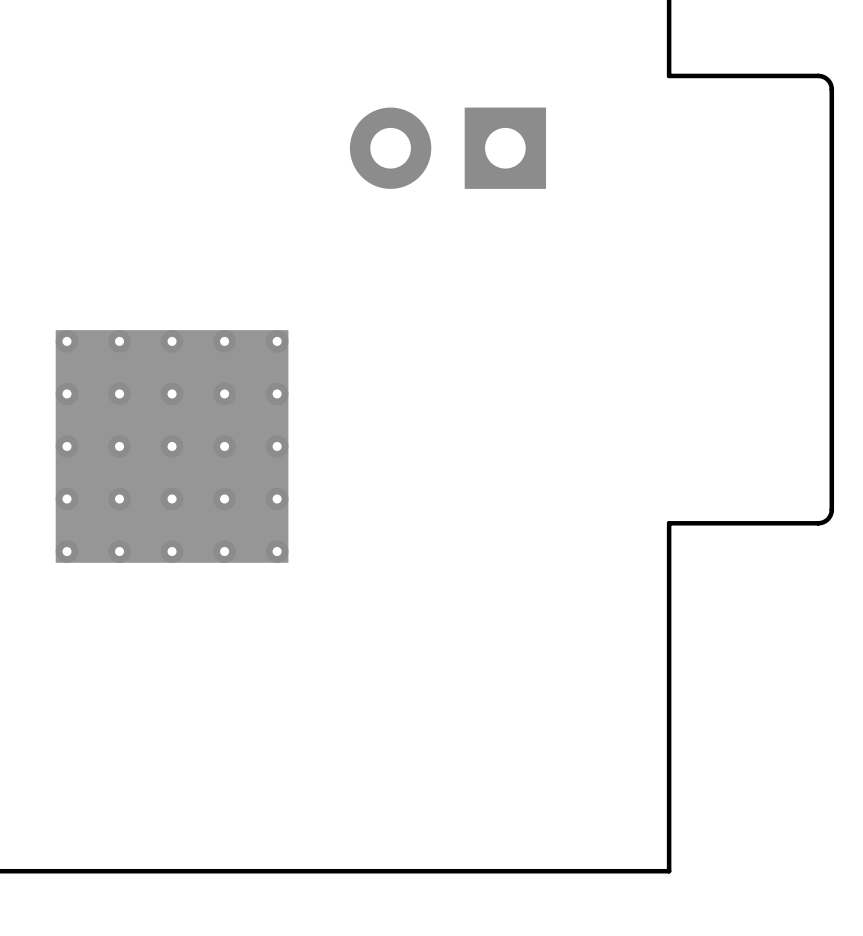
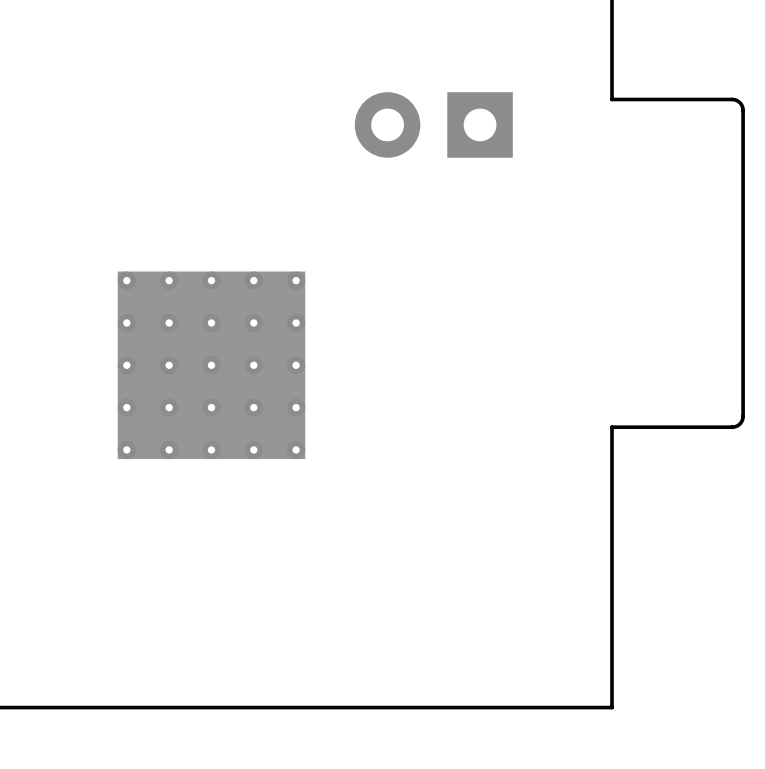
board edge: (669, 75) (821, 76) (828, 81) (831, 87) (831, 130) -> (612, 66) (612, 99) (733, 99) (739, 102) (743, 110)

